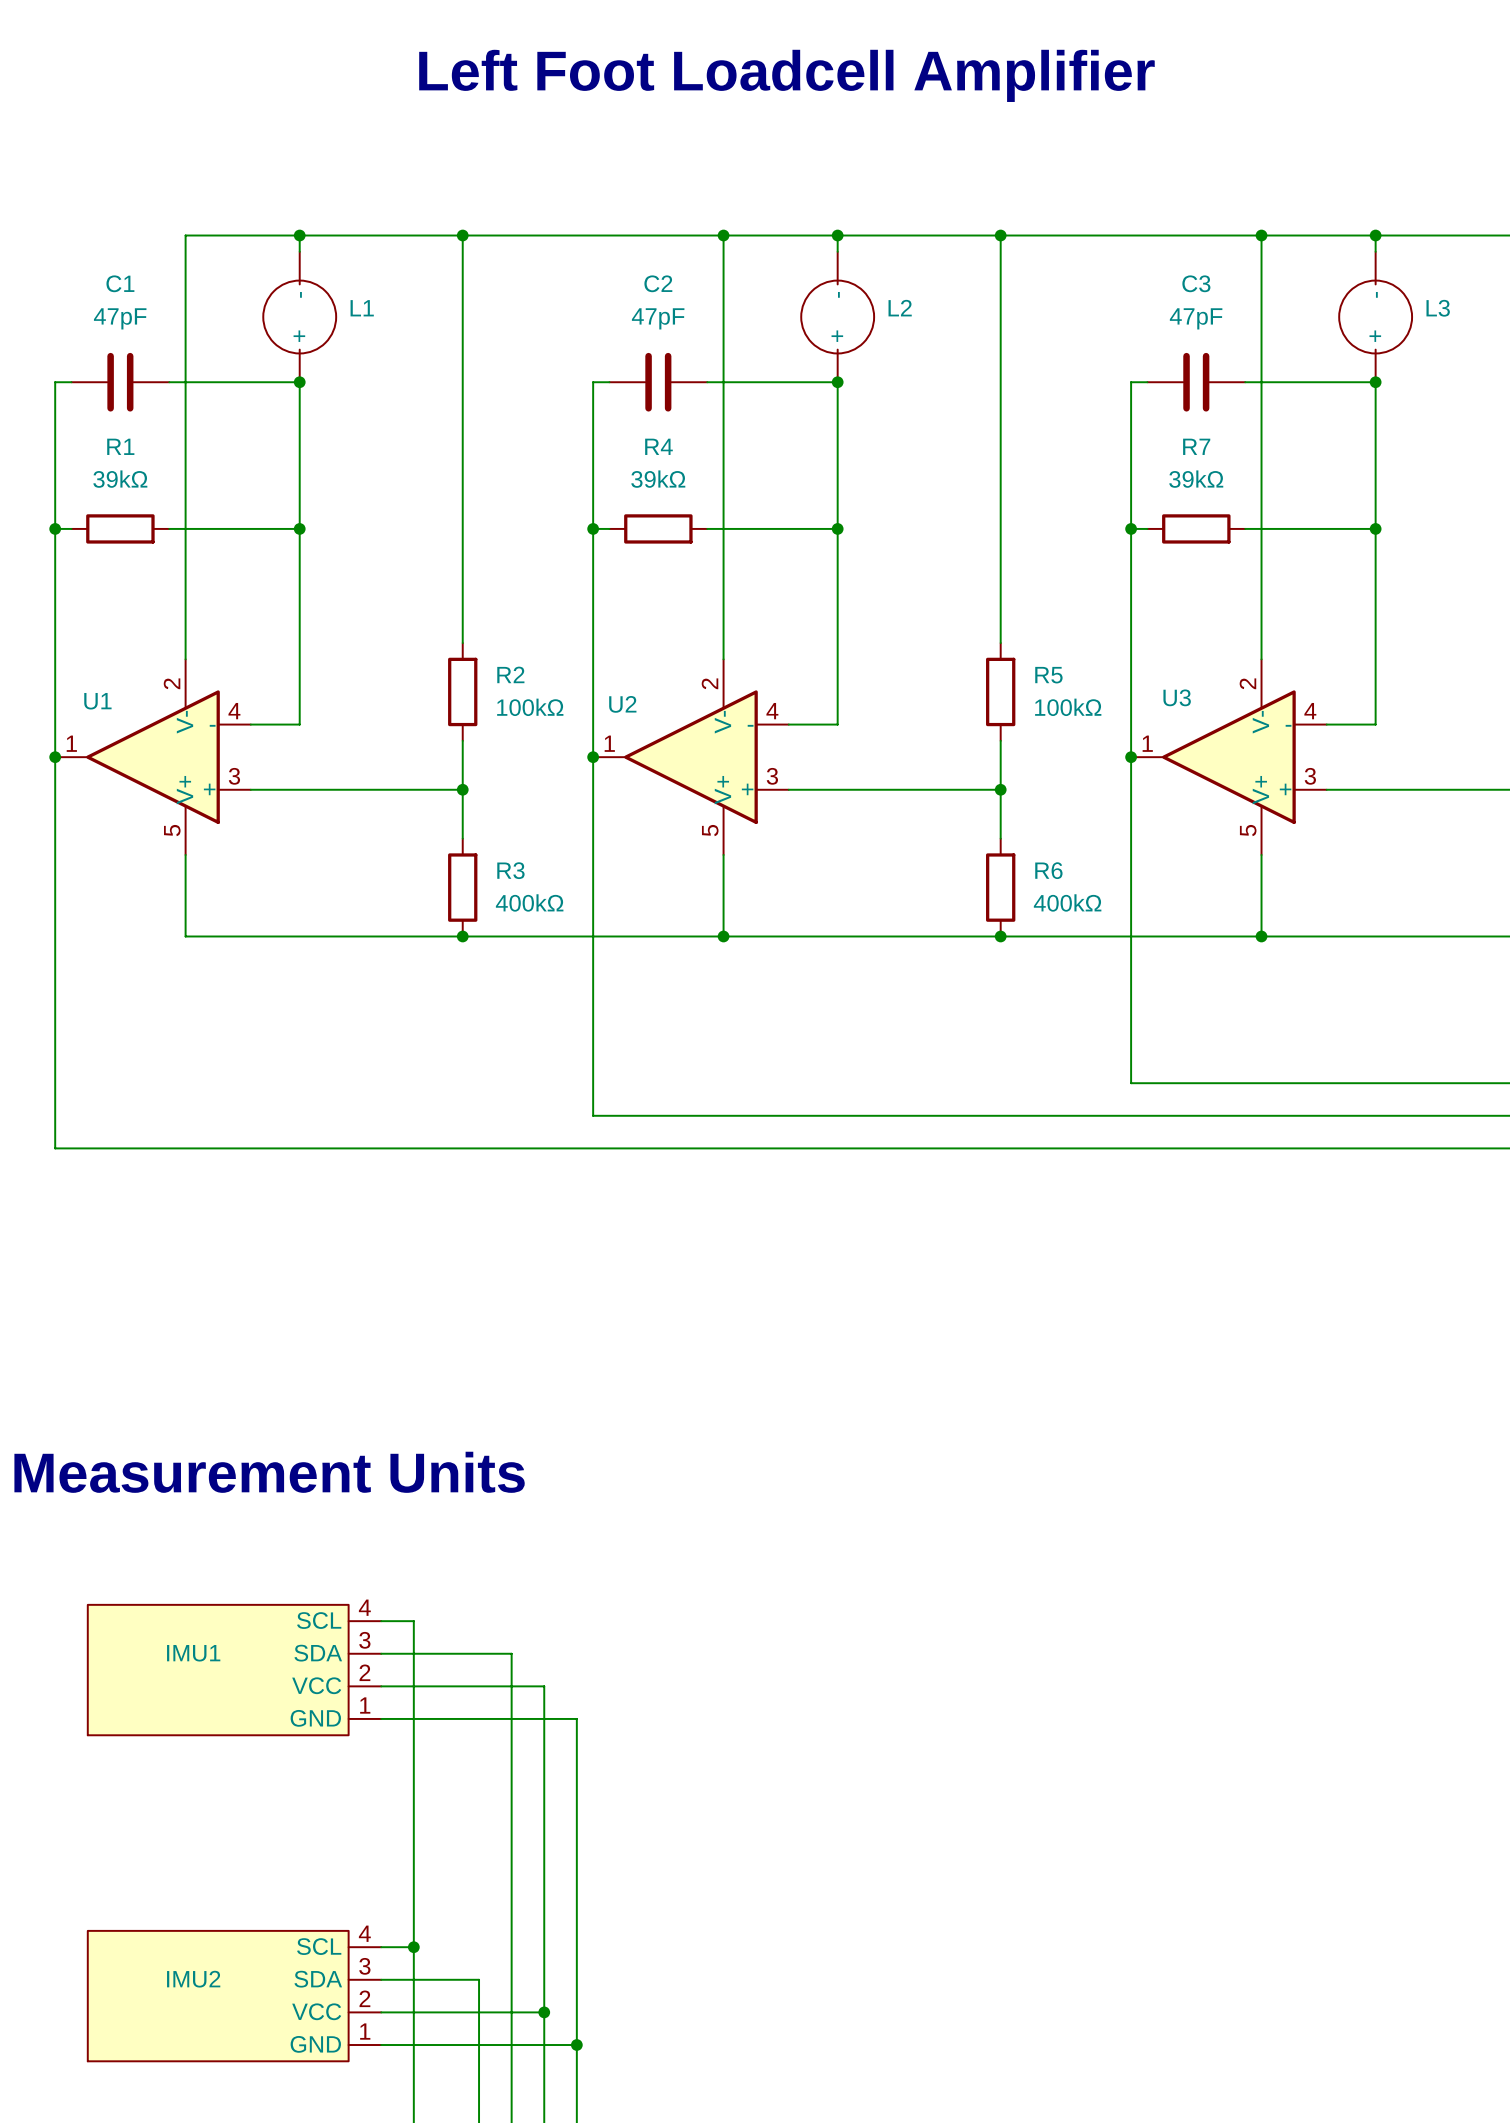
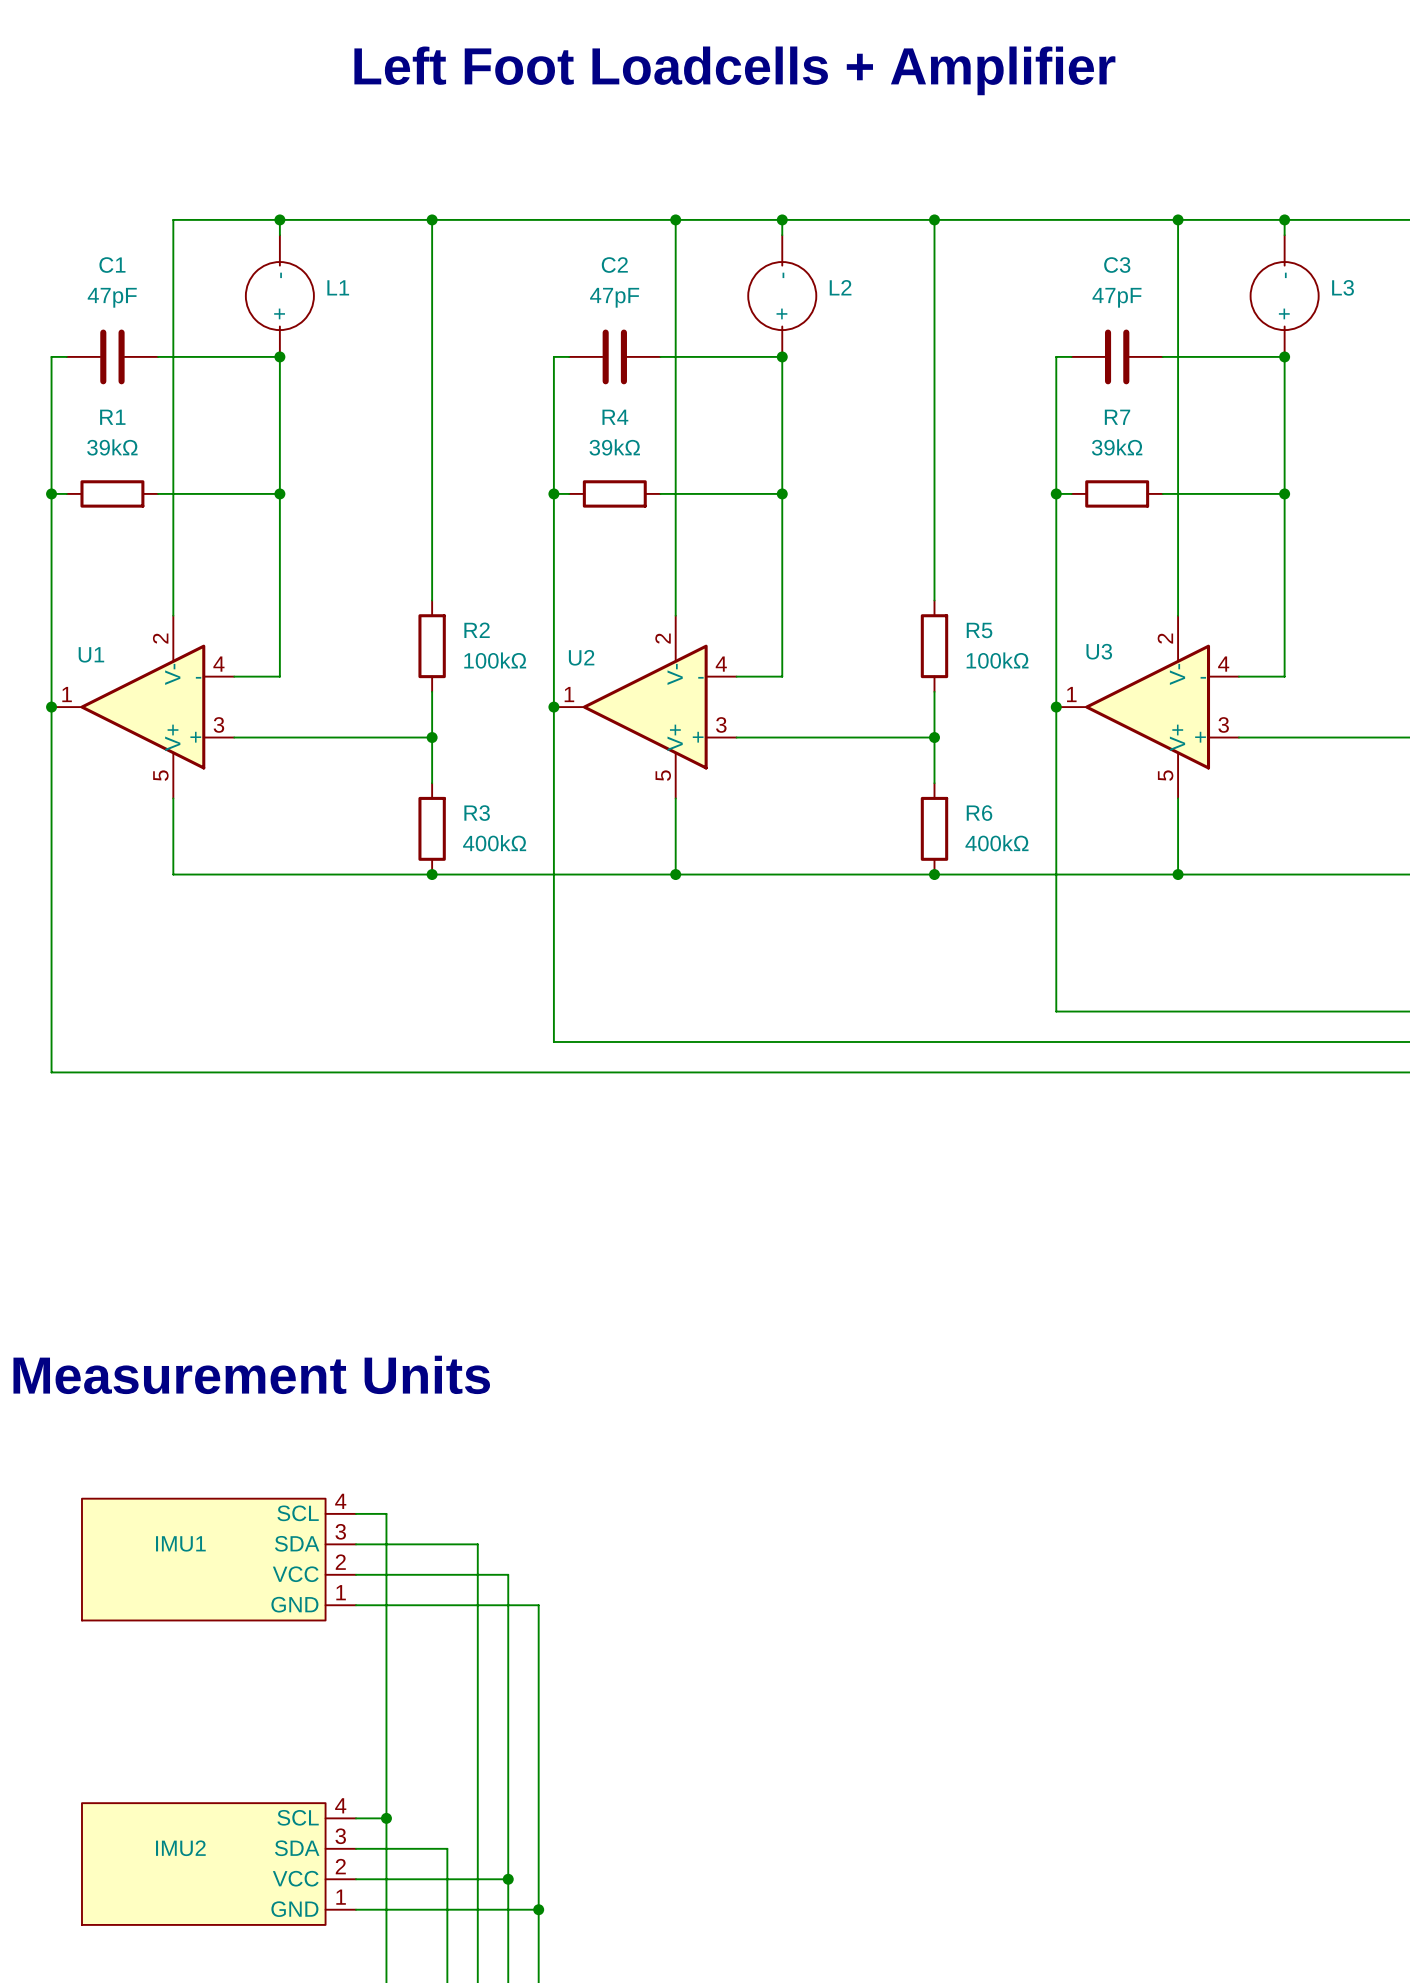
text: Left Foot Loadcell Amplifier (786, 75) -> Left Foot Loadcells + Amplifier (734, 70)

